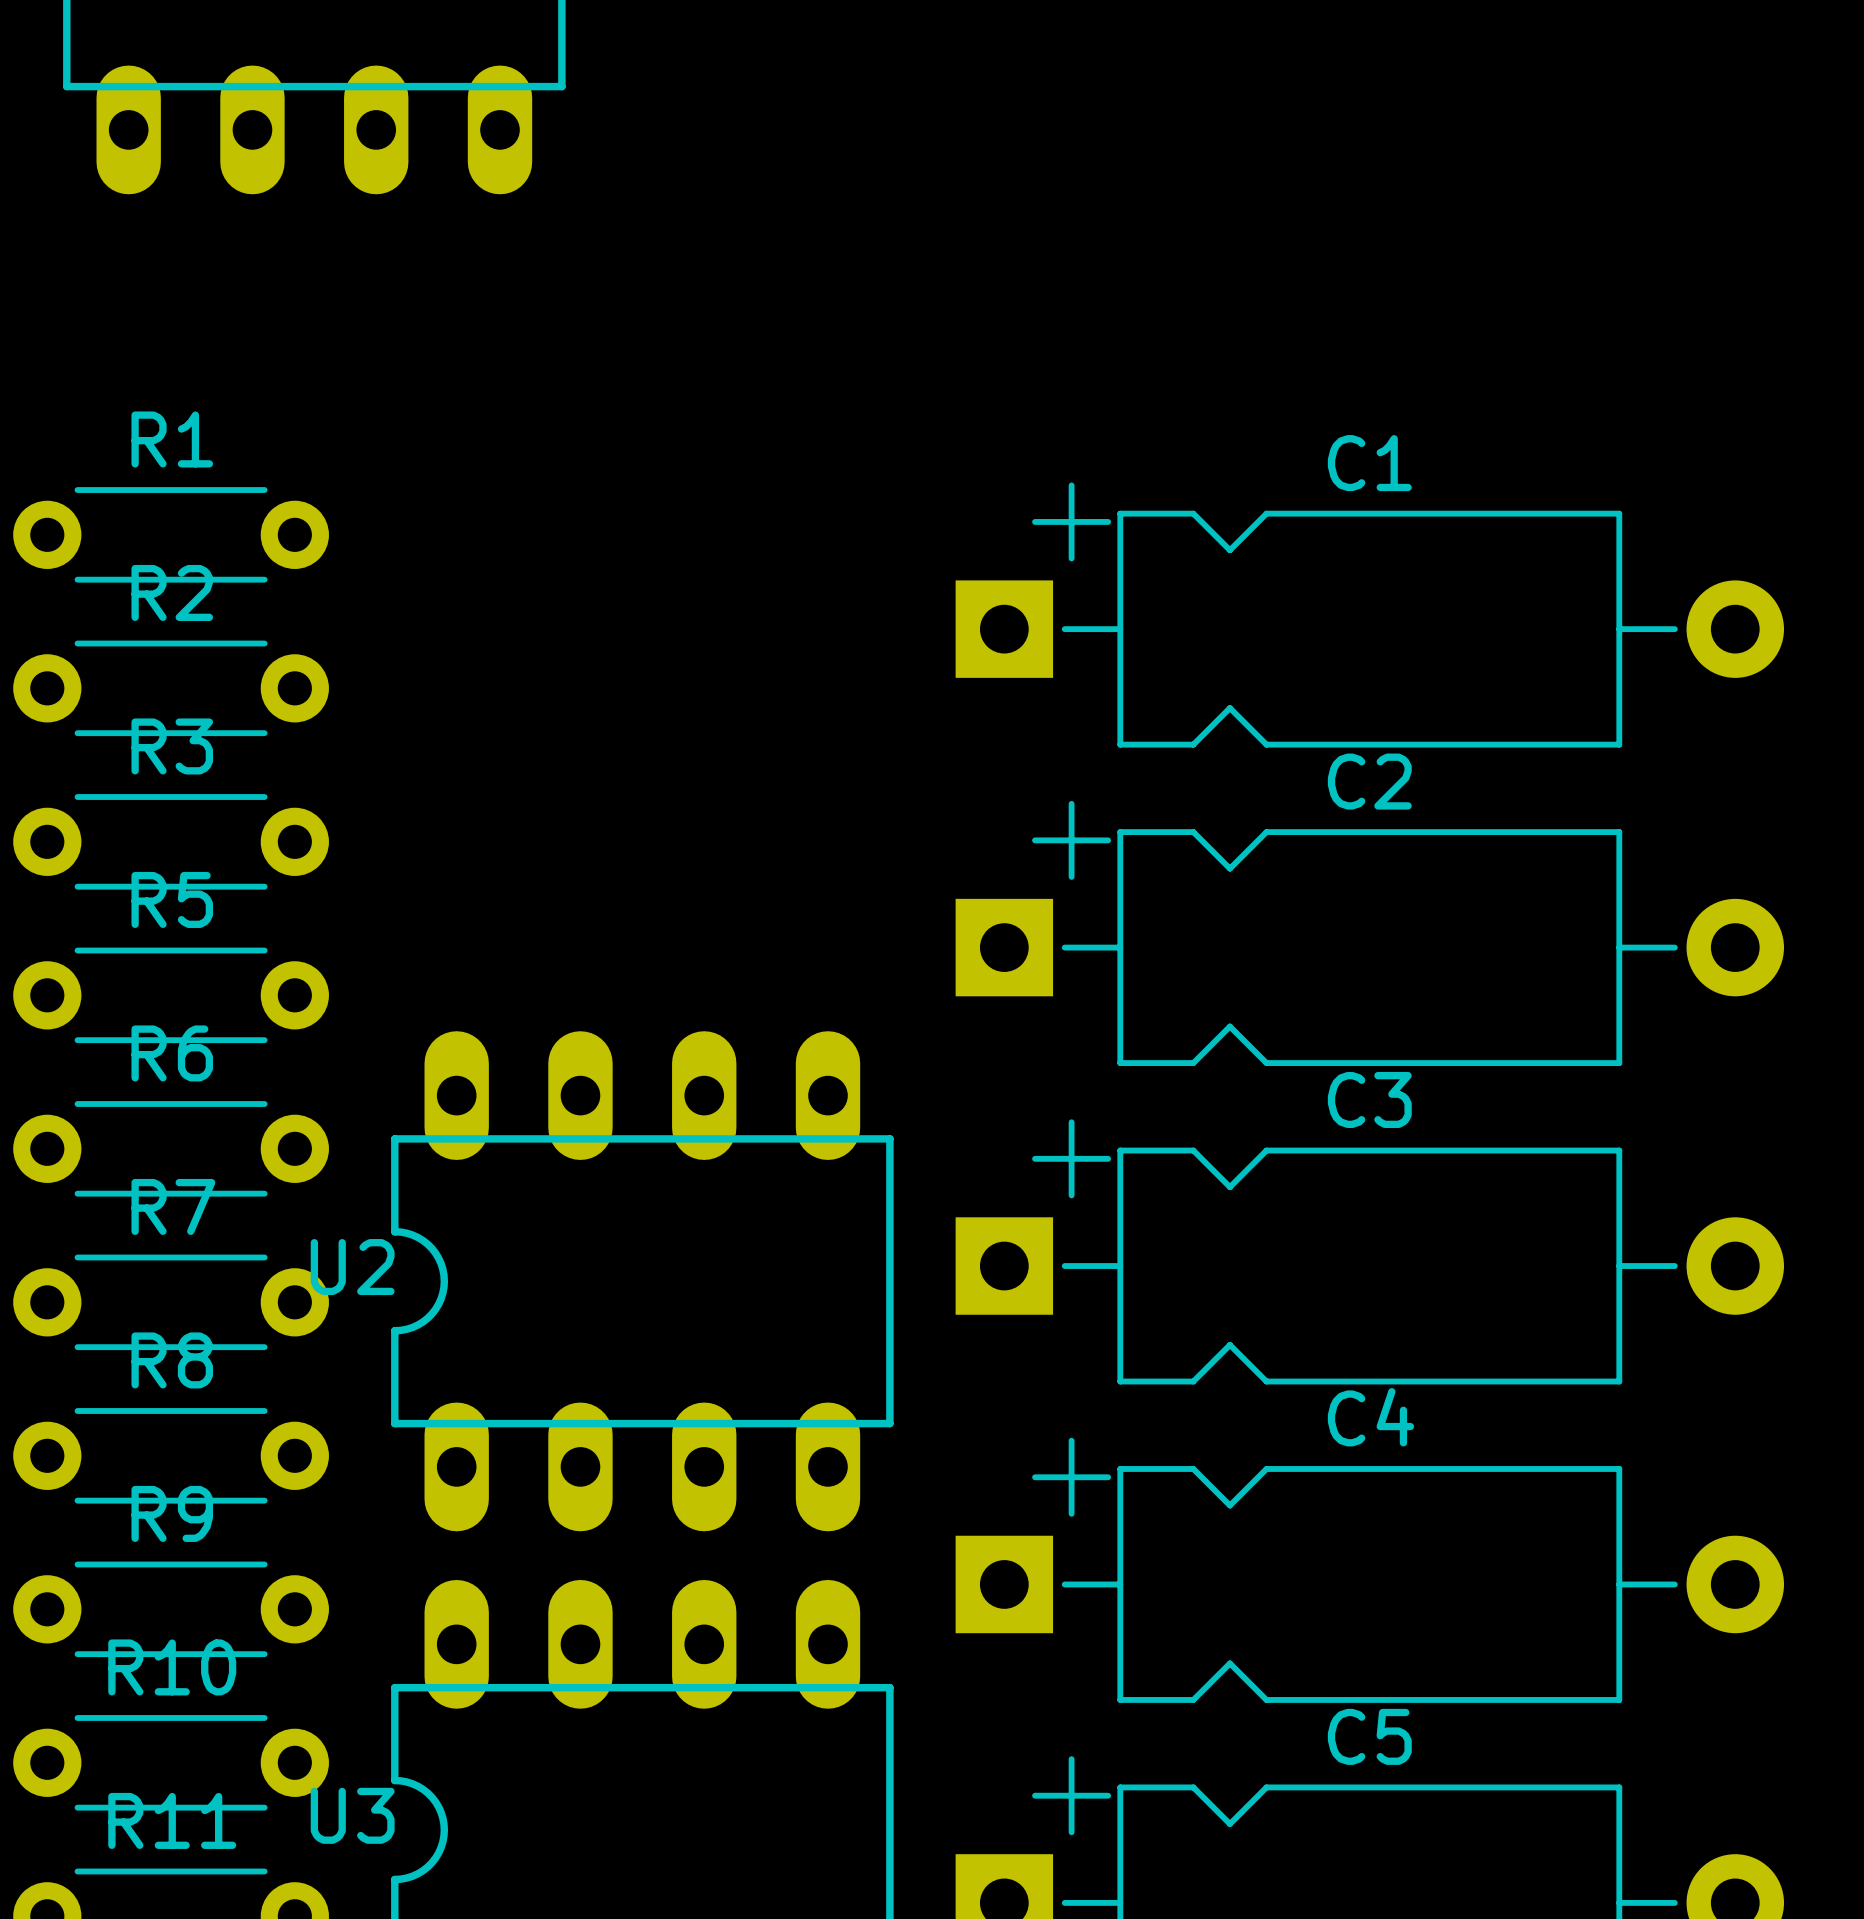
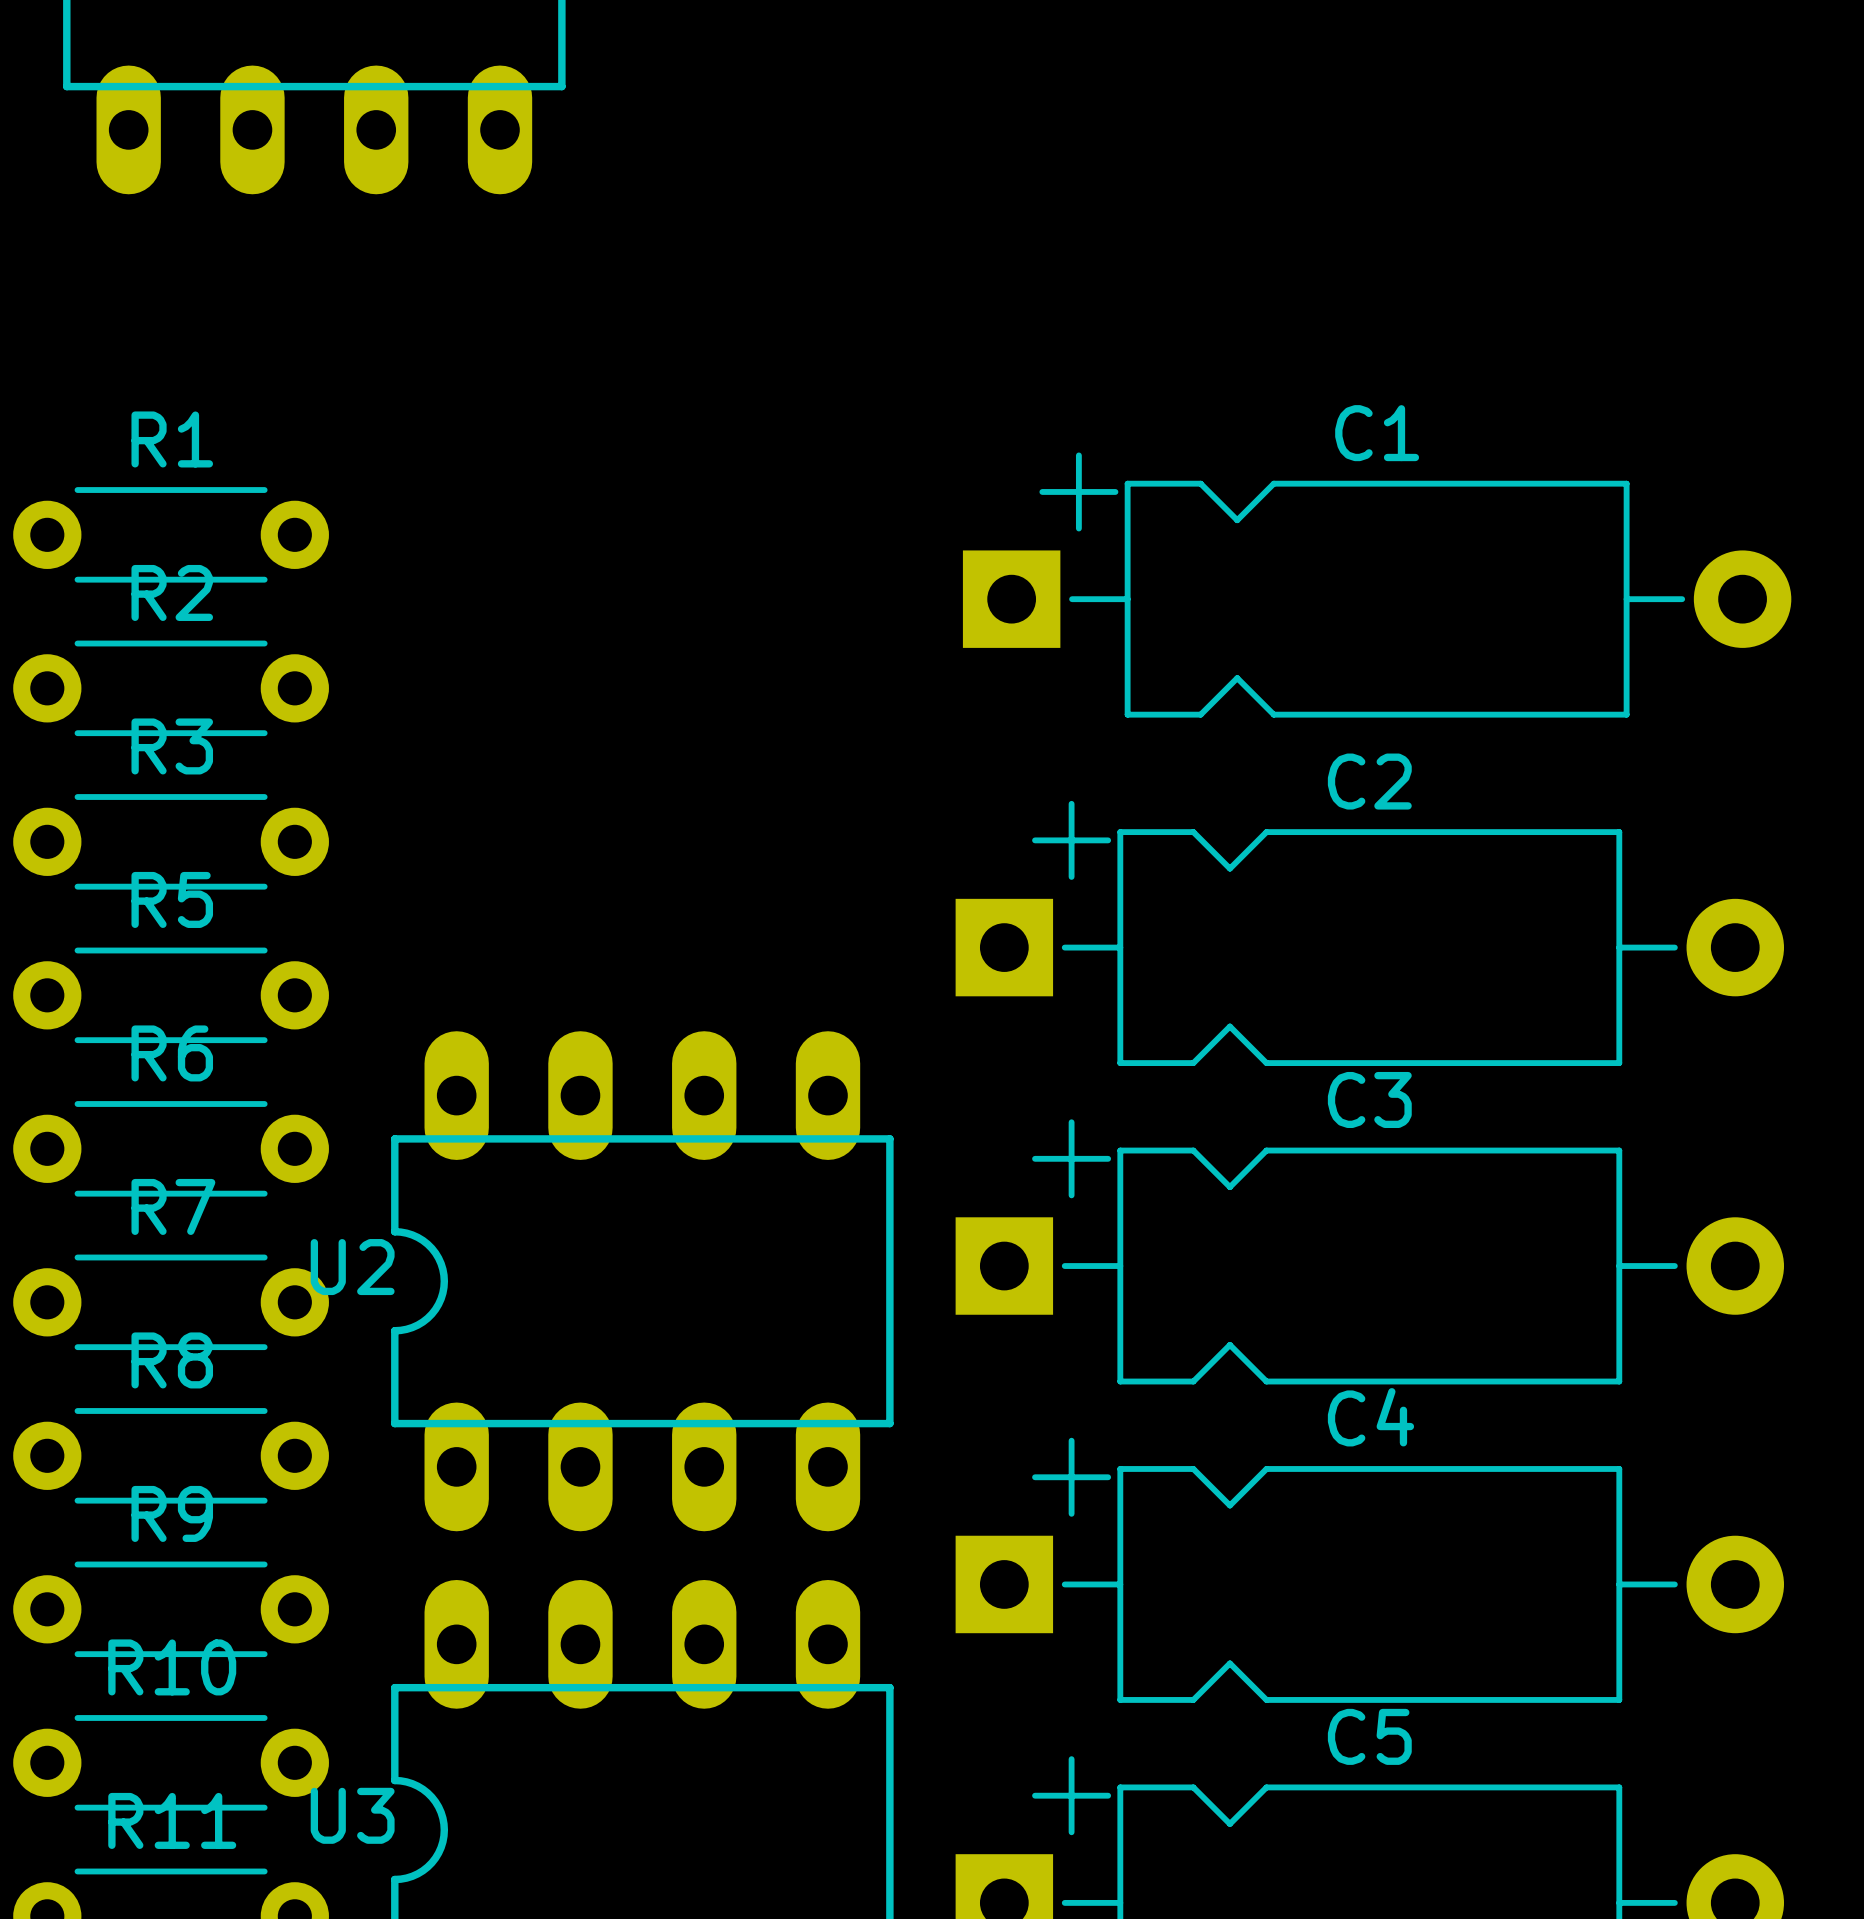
C1 position: (1369, 615) -> (1377, 585)

